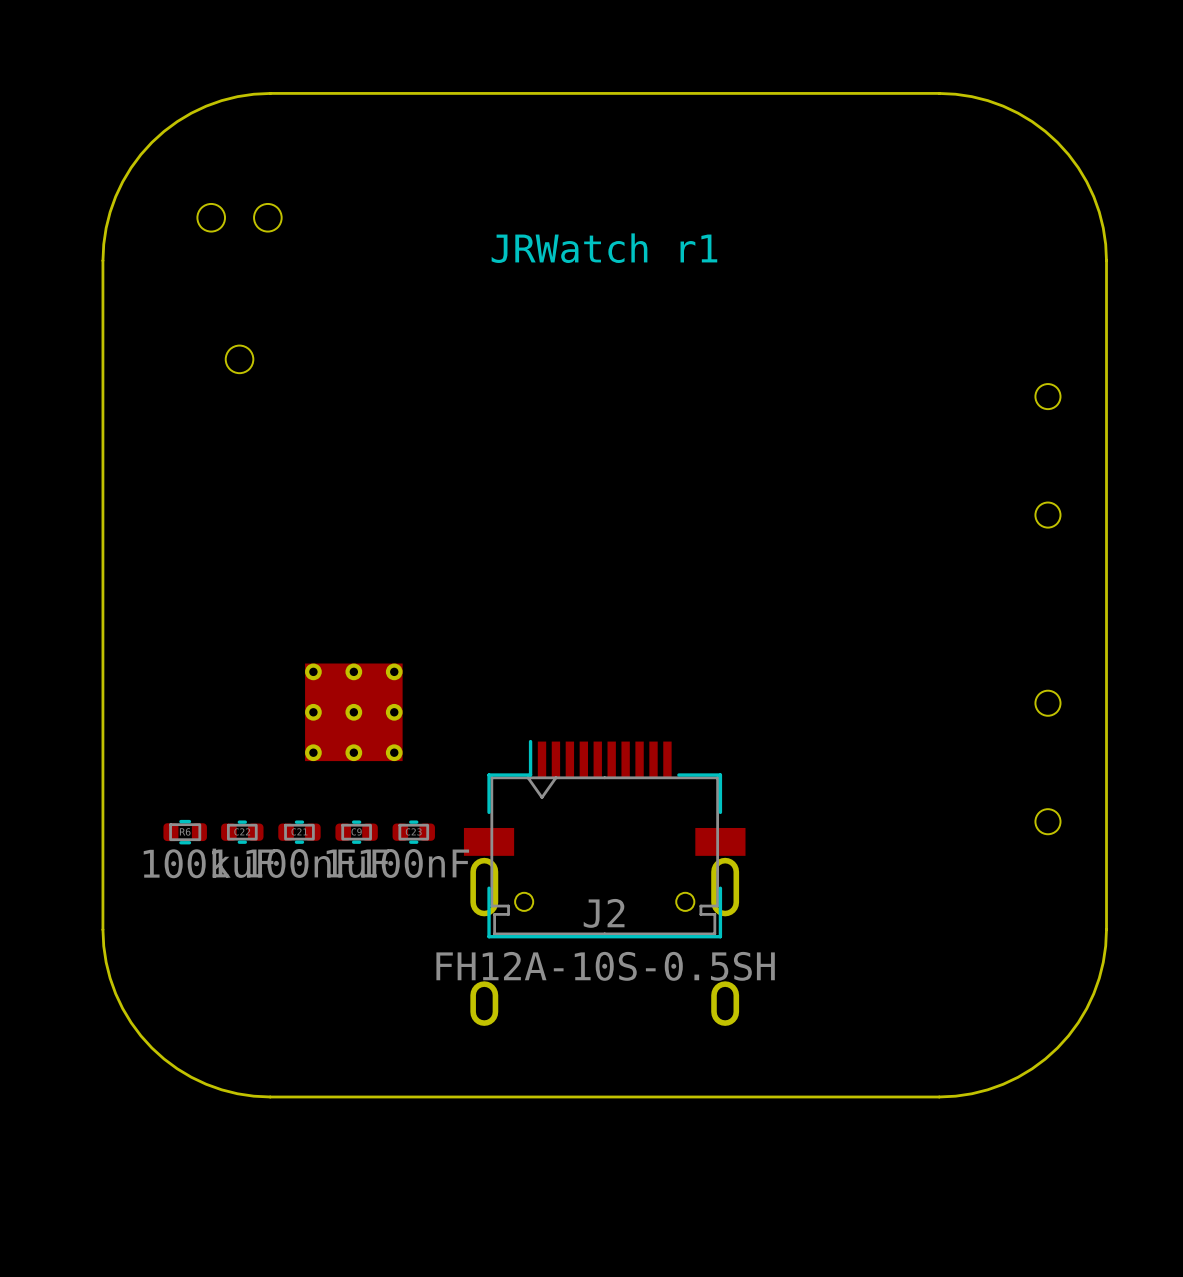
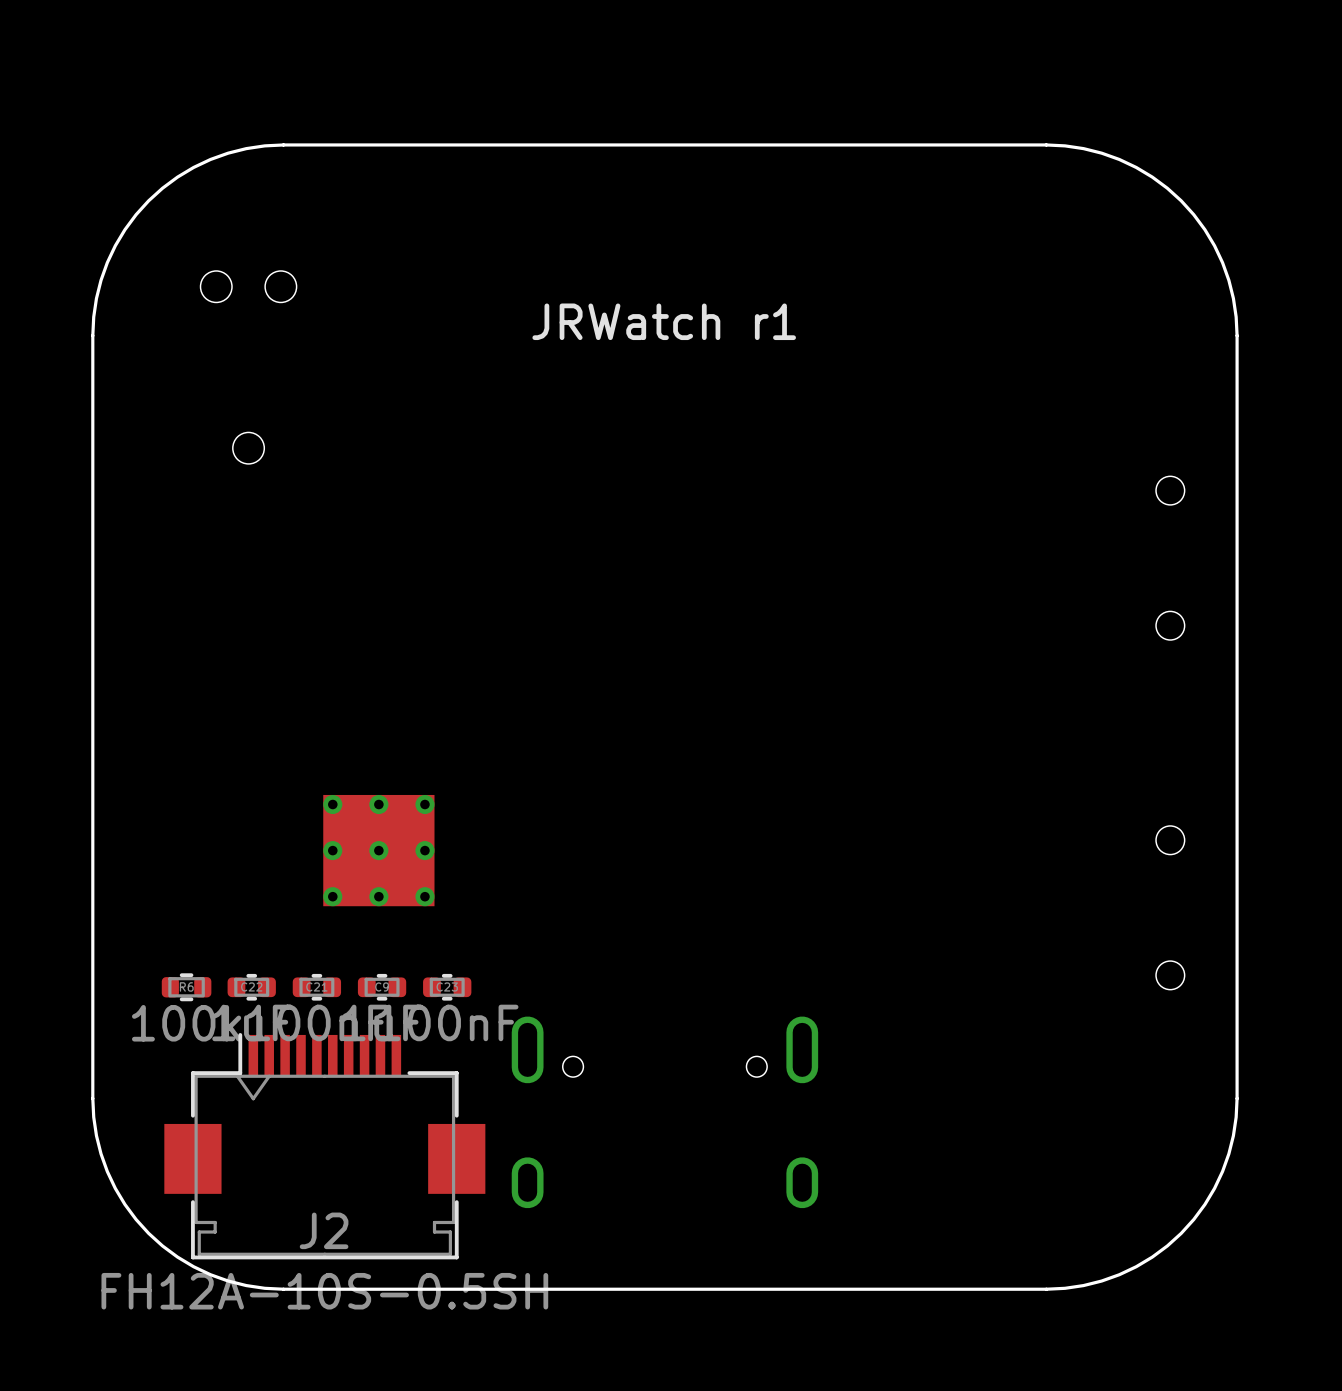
J2 footprint: [463, 739, 746, 939] -> [164, 1033, 486, 1260]

